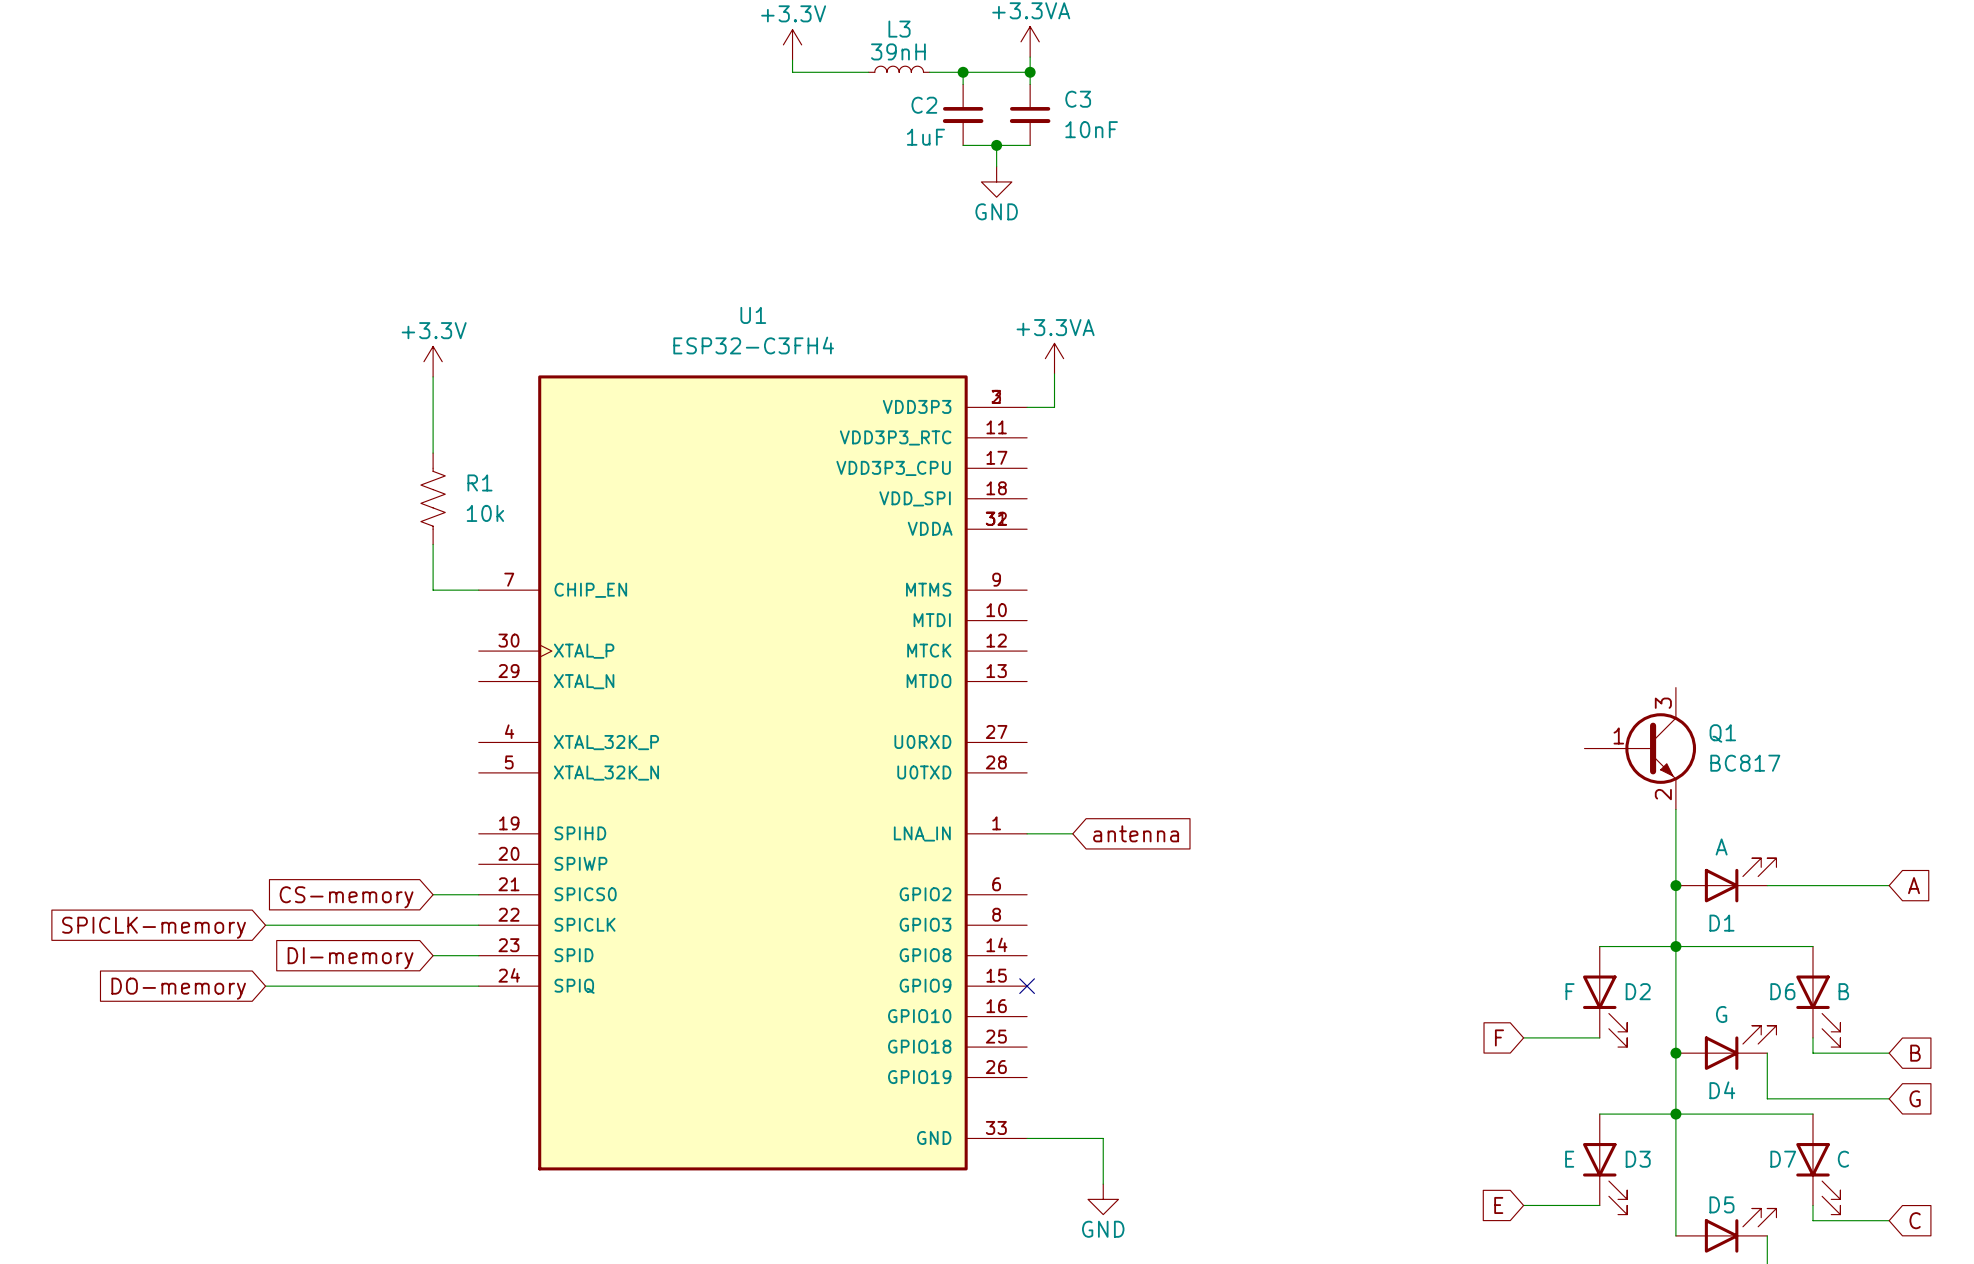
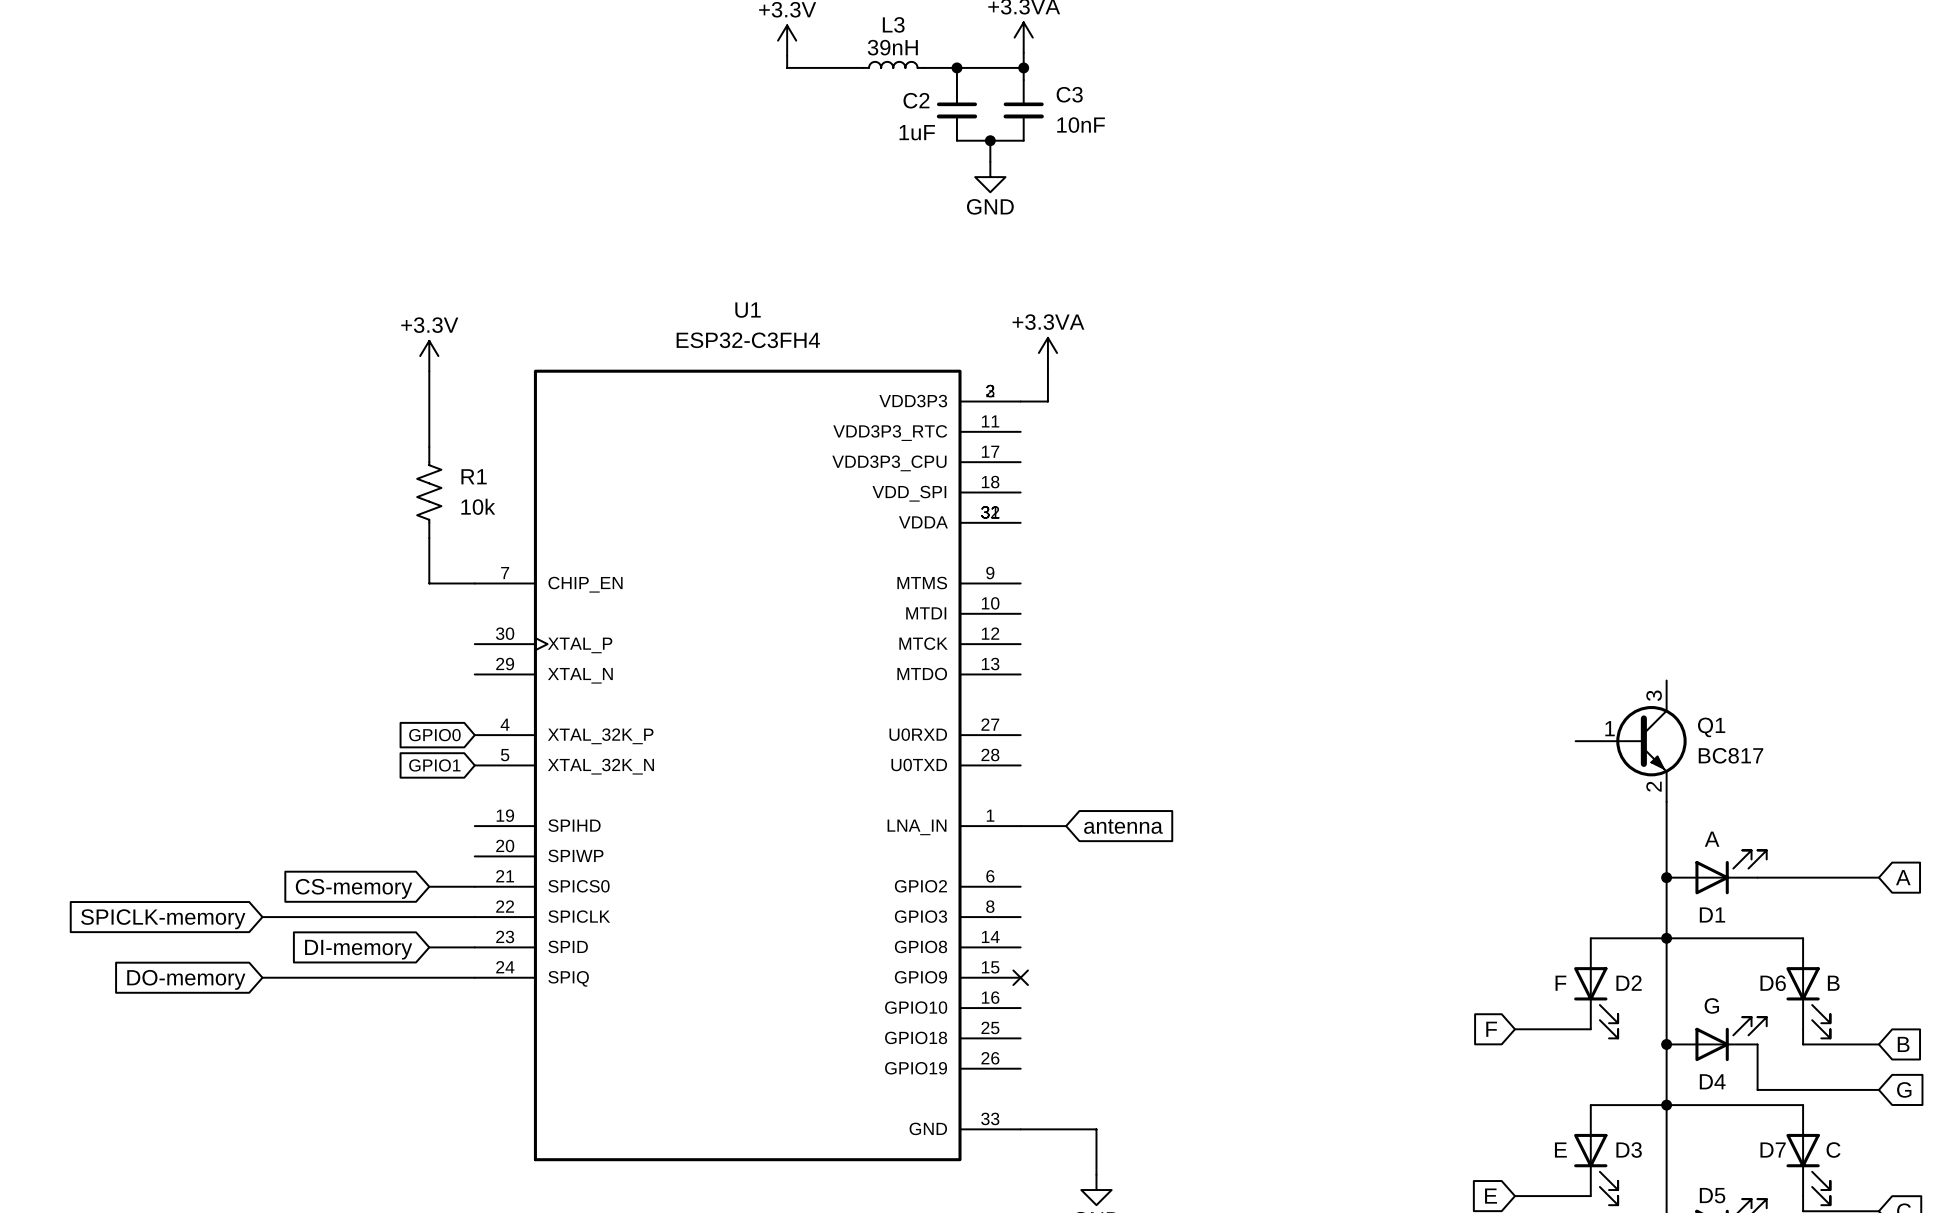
global label: none -> GPIO0 (434, 735)
global label: none -> GPIO1 (434, 765)

